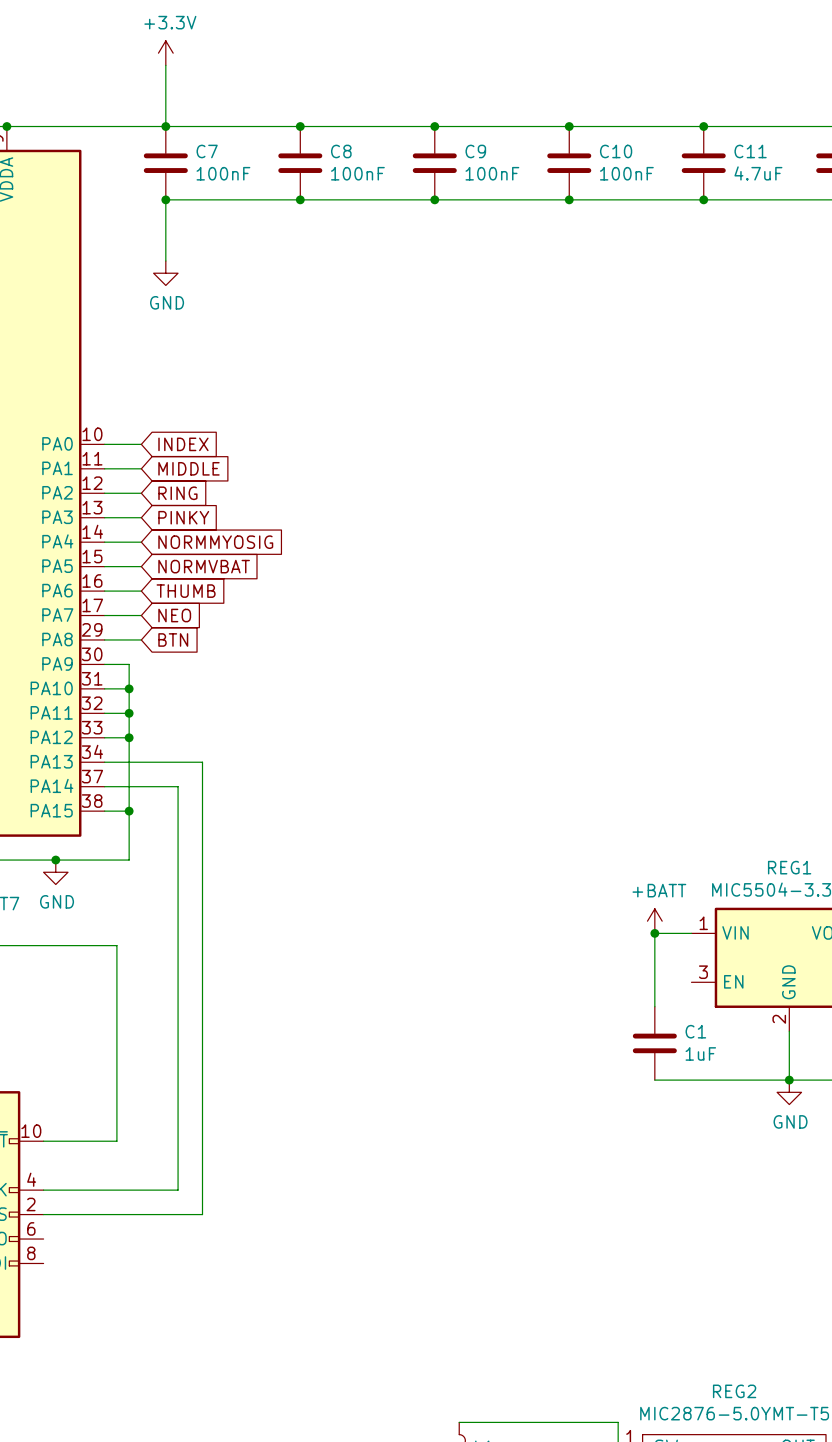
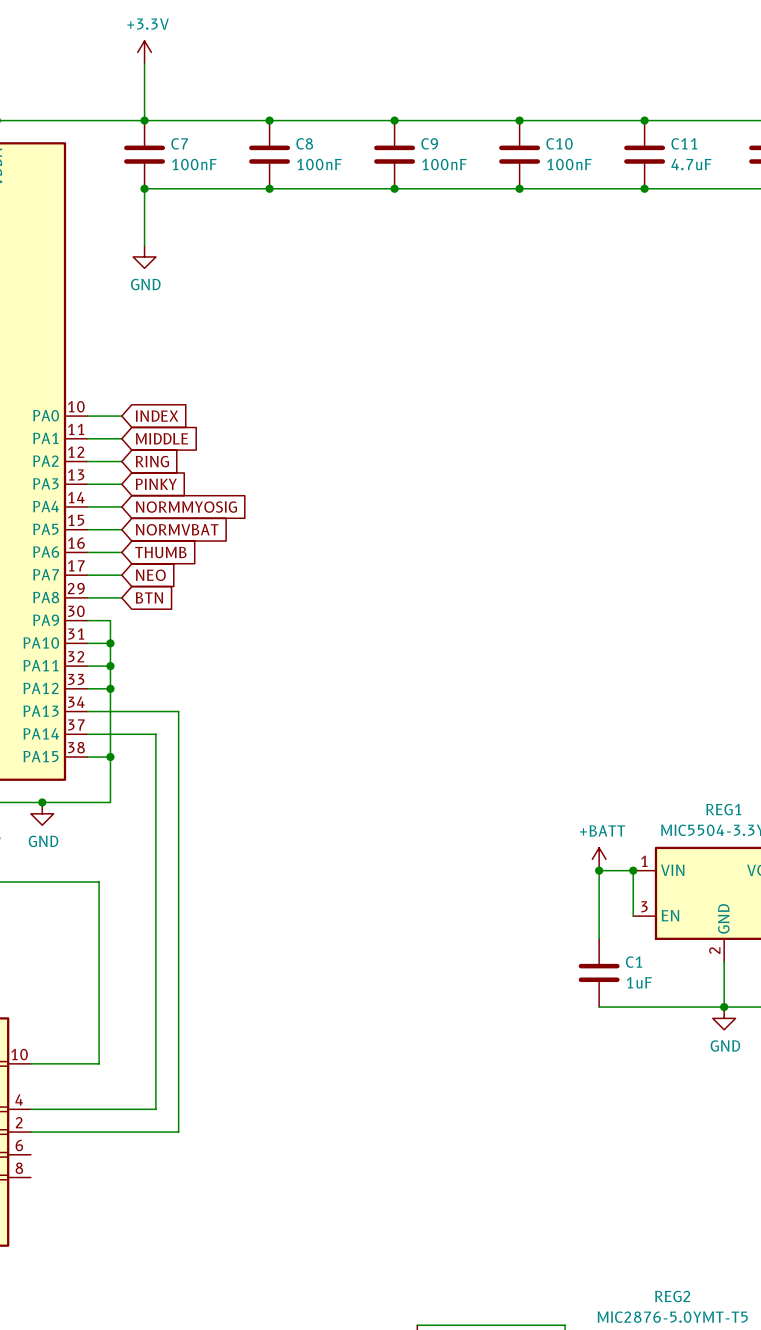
wire: none -> (633, 870) (633, 916)
junction: none -> (633, 870)

